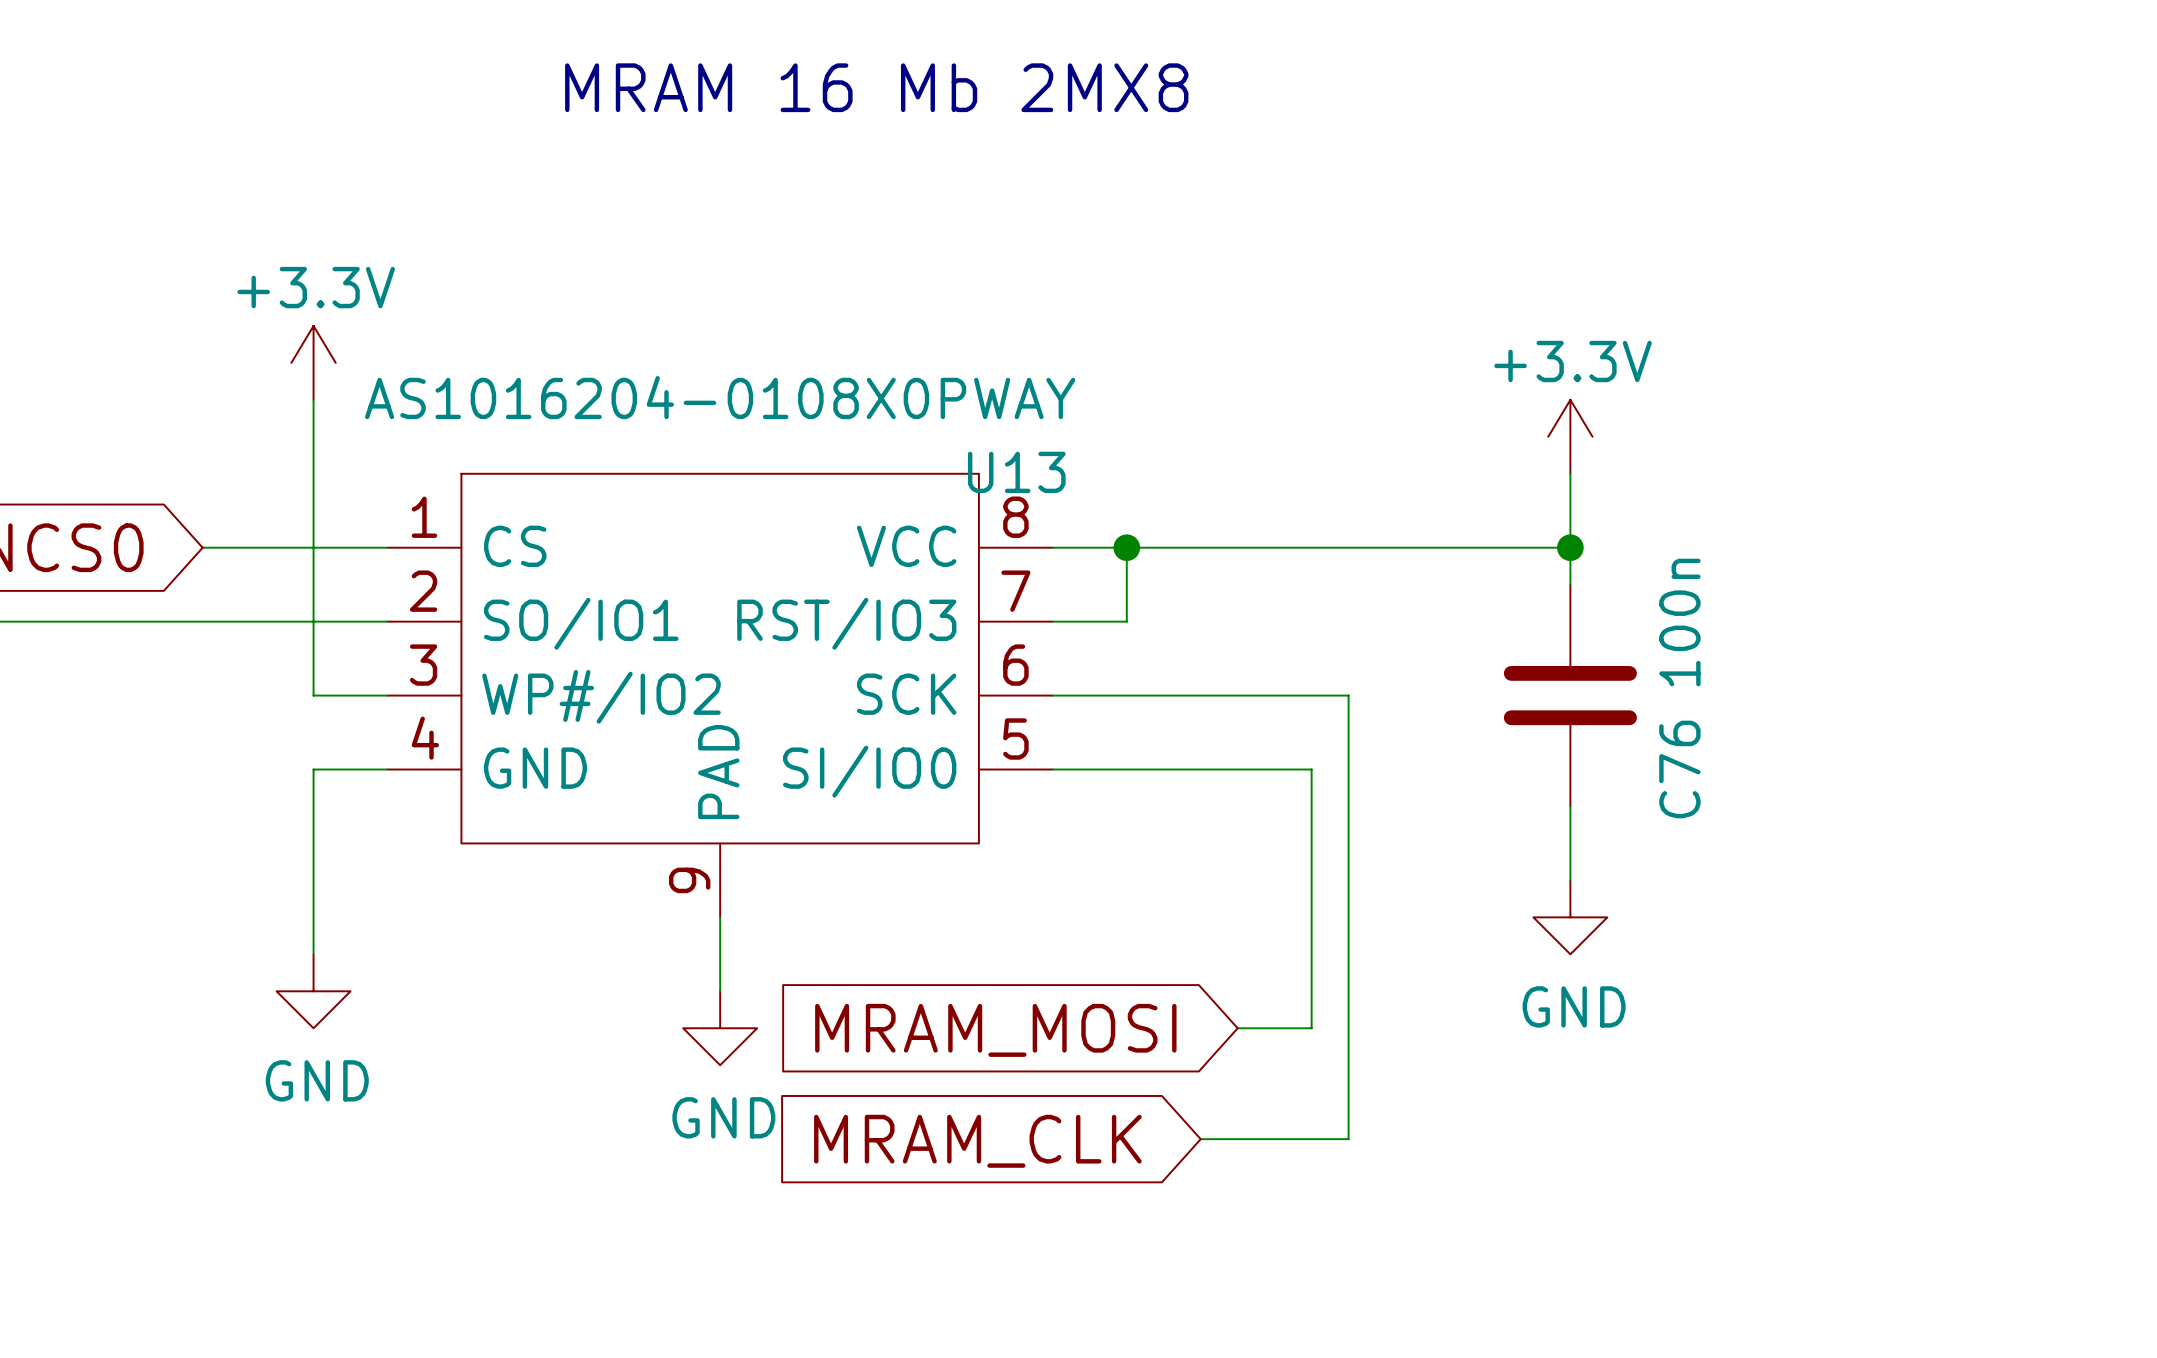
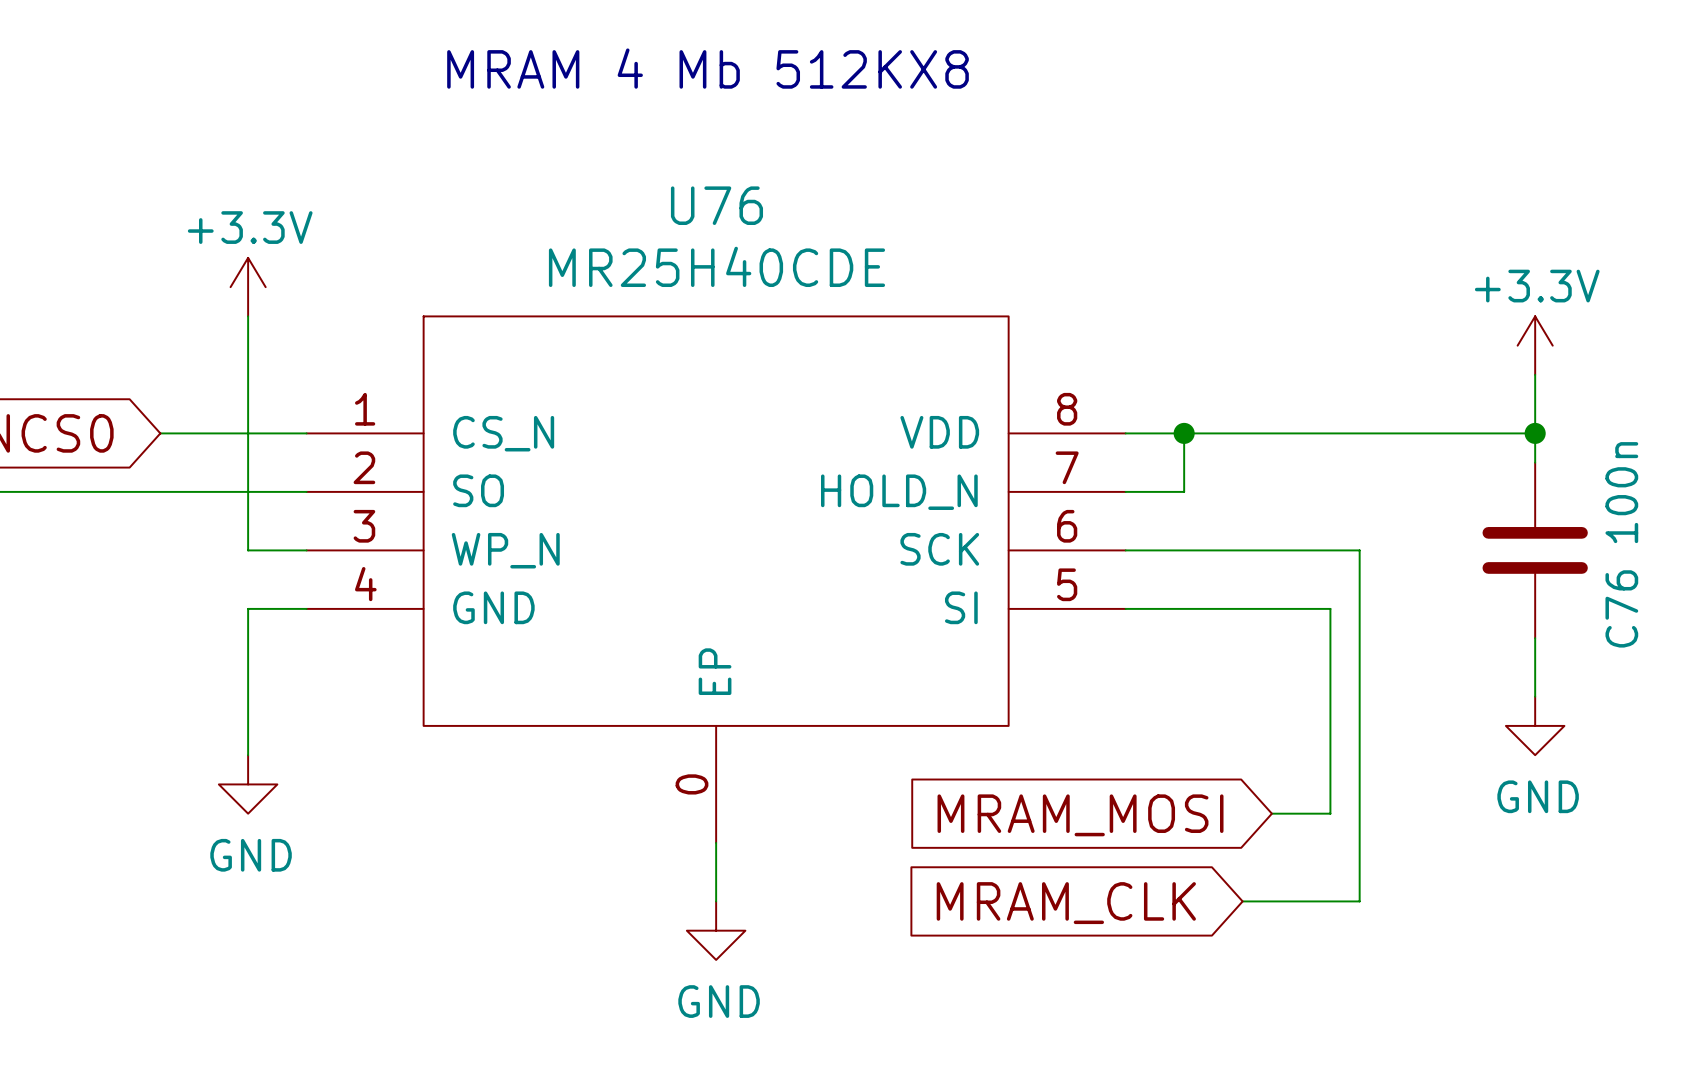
text: MRAM 16 Mb 2MX8 (876, 87) -> MRAM 4 Mb 512KX8 (708, 68)
power symbol position: +3.3V (1570, 436) -> +3.3V (1535, 345)
wire: (1570, 473) (1570, 584) -> (1535, 374) (1535, 462)
wire: (1052, 547) (1422, 547) -> (1242, 433) (1535, 433)
wire: (1126, 547) (1126, 621) (1052, 621) -> (1184, 433) (1184, 491) (1125, 491)
junction: (1126, 547) -> none
junction position: (1570, 547) -> (1184, 433)
junction: none -> (1535, 433)
U13: AS1016204-0108X0PWAY (720, 695) -> none
wire: (1052, 695) (1348, 695) (1348, 1139) (1200, 1139) -> (1125, 550) (1359, 550) (1359, 901) (1242, 901)
C76 position: (1570, 695) -> (1535, 550)
U76: none -> MR25H40CDE (716, 579)
wire: (1052, 769) (1311, 769) (1311, 1028) (1237, 1028) -> (1125, 608) (1330, 608) (1330, 813) (1271, 813)
wire: (1570, 806) (1570, 880) -> (1535, 638) (1535, 696)
wire: (720, 917) (720, 991) -> (716, 842) (716, 901)
power symbol: GND (1570, 917) -> none
power symbol: none -> GND (1535, 725)
power symbol position: GND (720, 1028) -> GND (716, 930)
global label position: MRAM_MOSI (995, 1030) -> MRAM_MOSI (1080, 815)
global label position: MRAM_CLK (977, 1141) -> MRAM_CLK (1066, 903)

